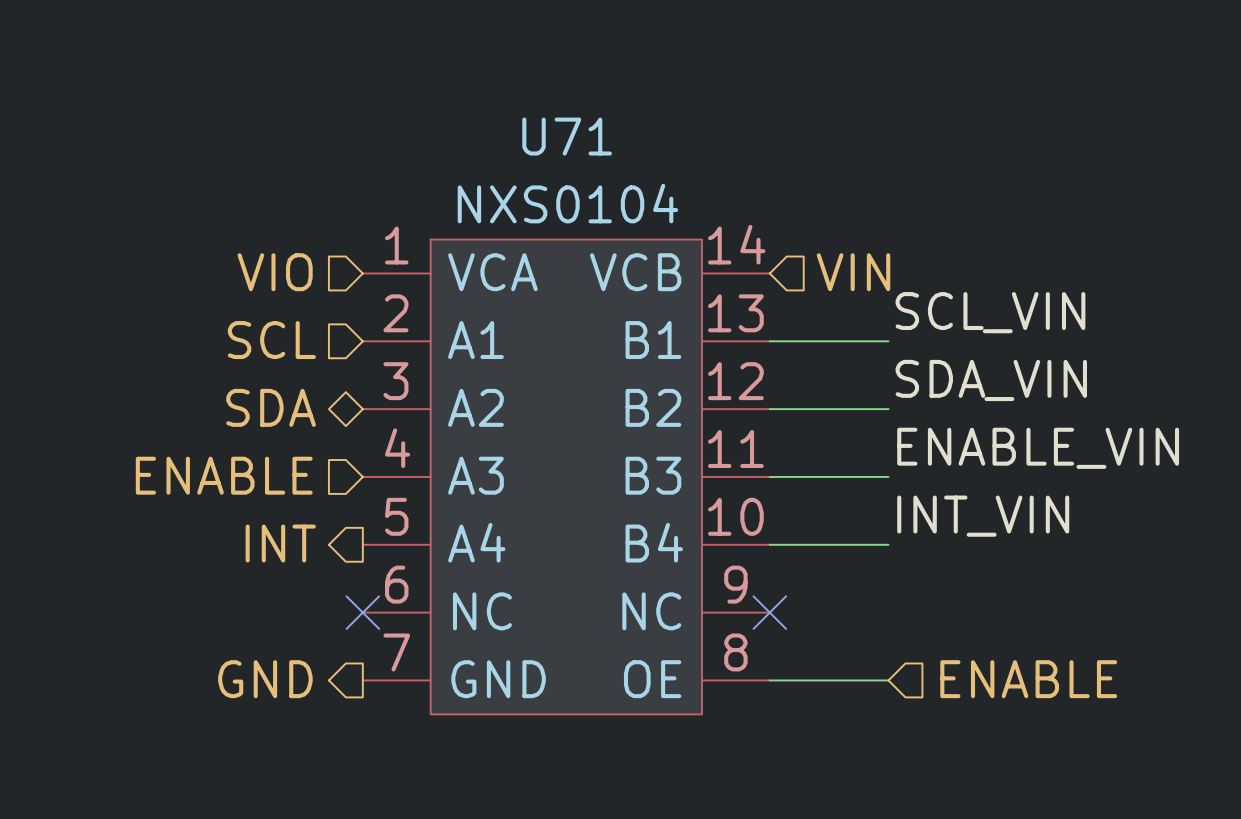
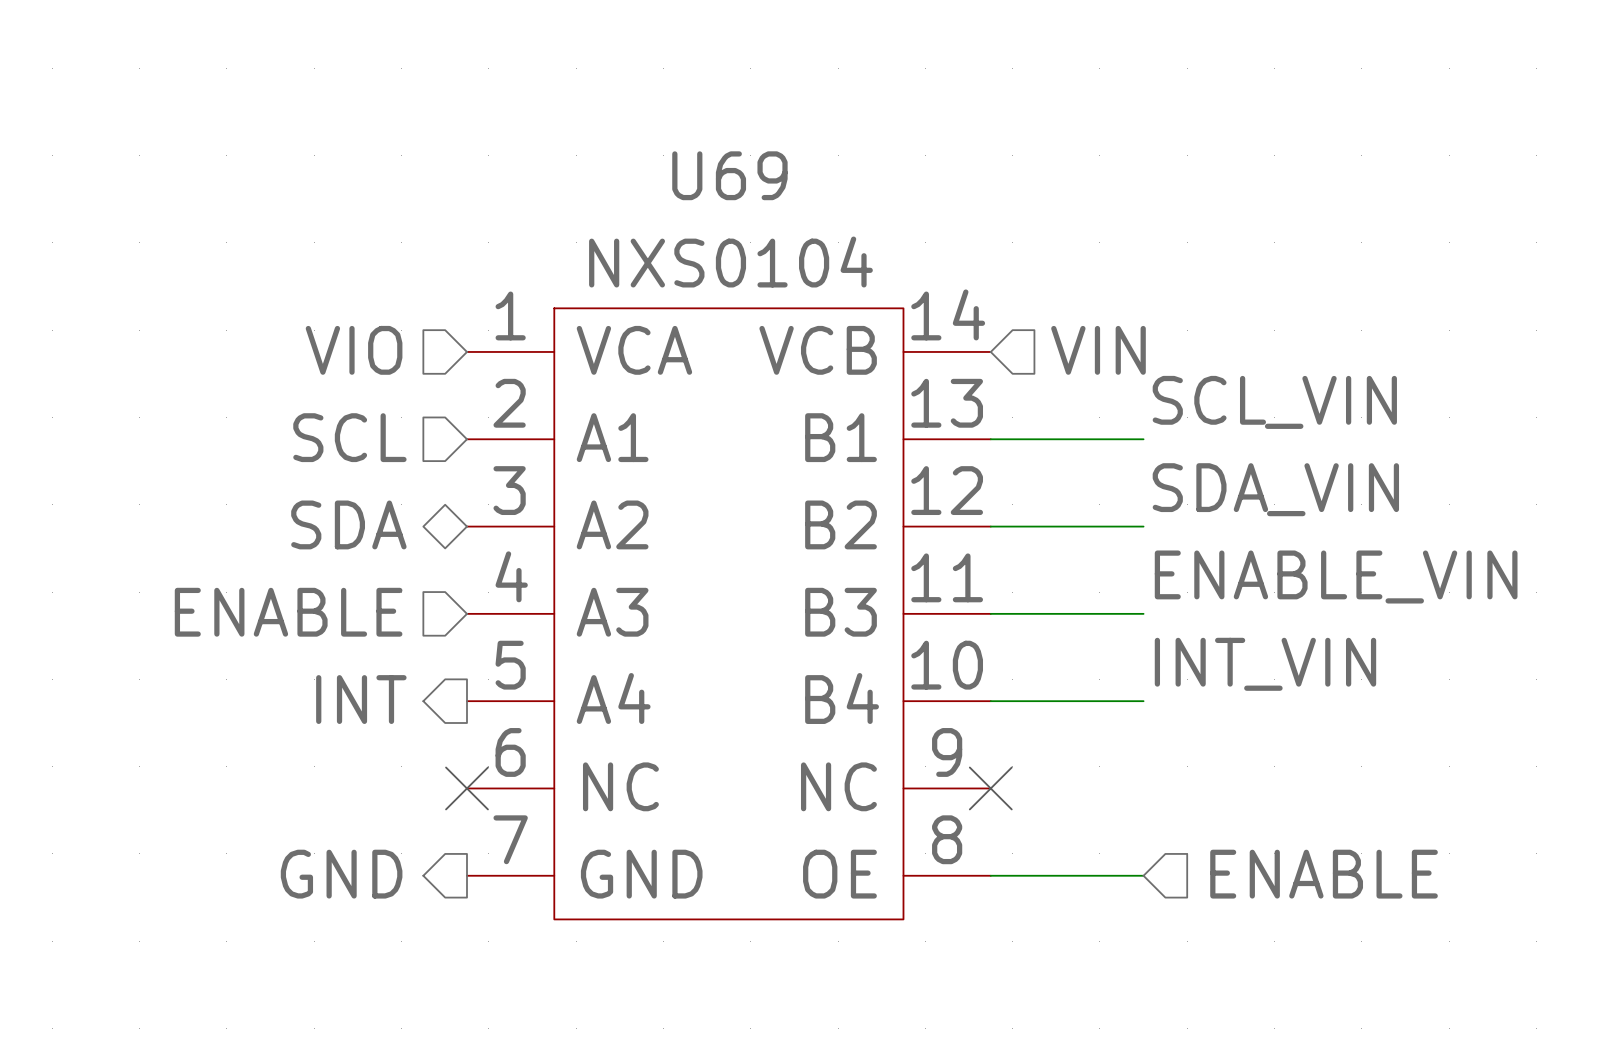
U71 name: U71 (567, 136) -> U69 (729, 175)

